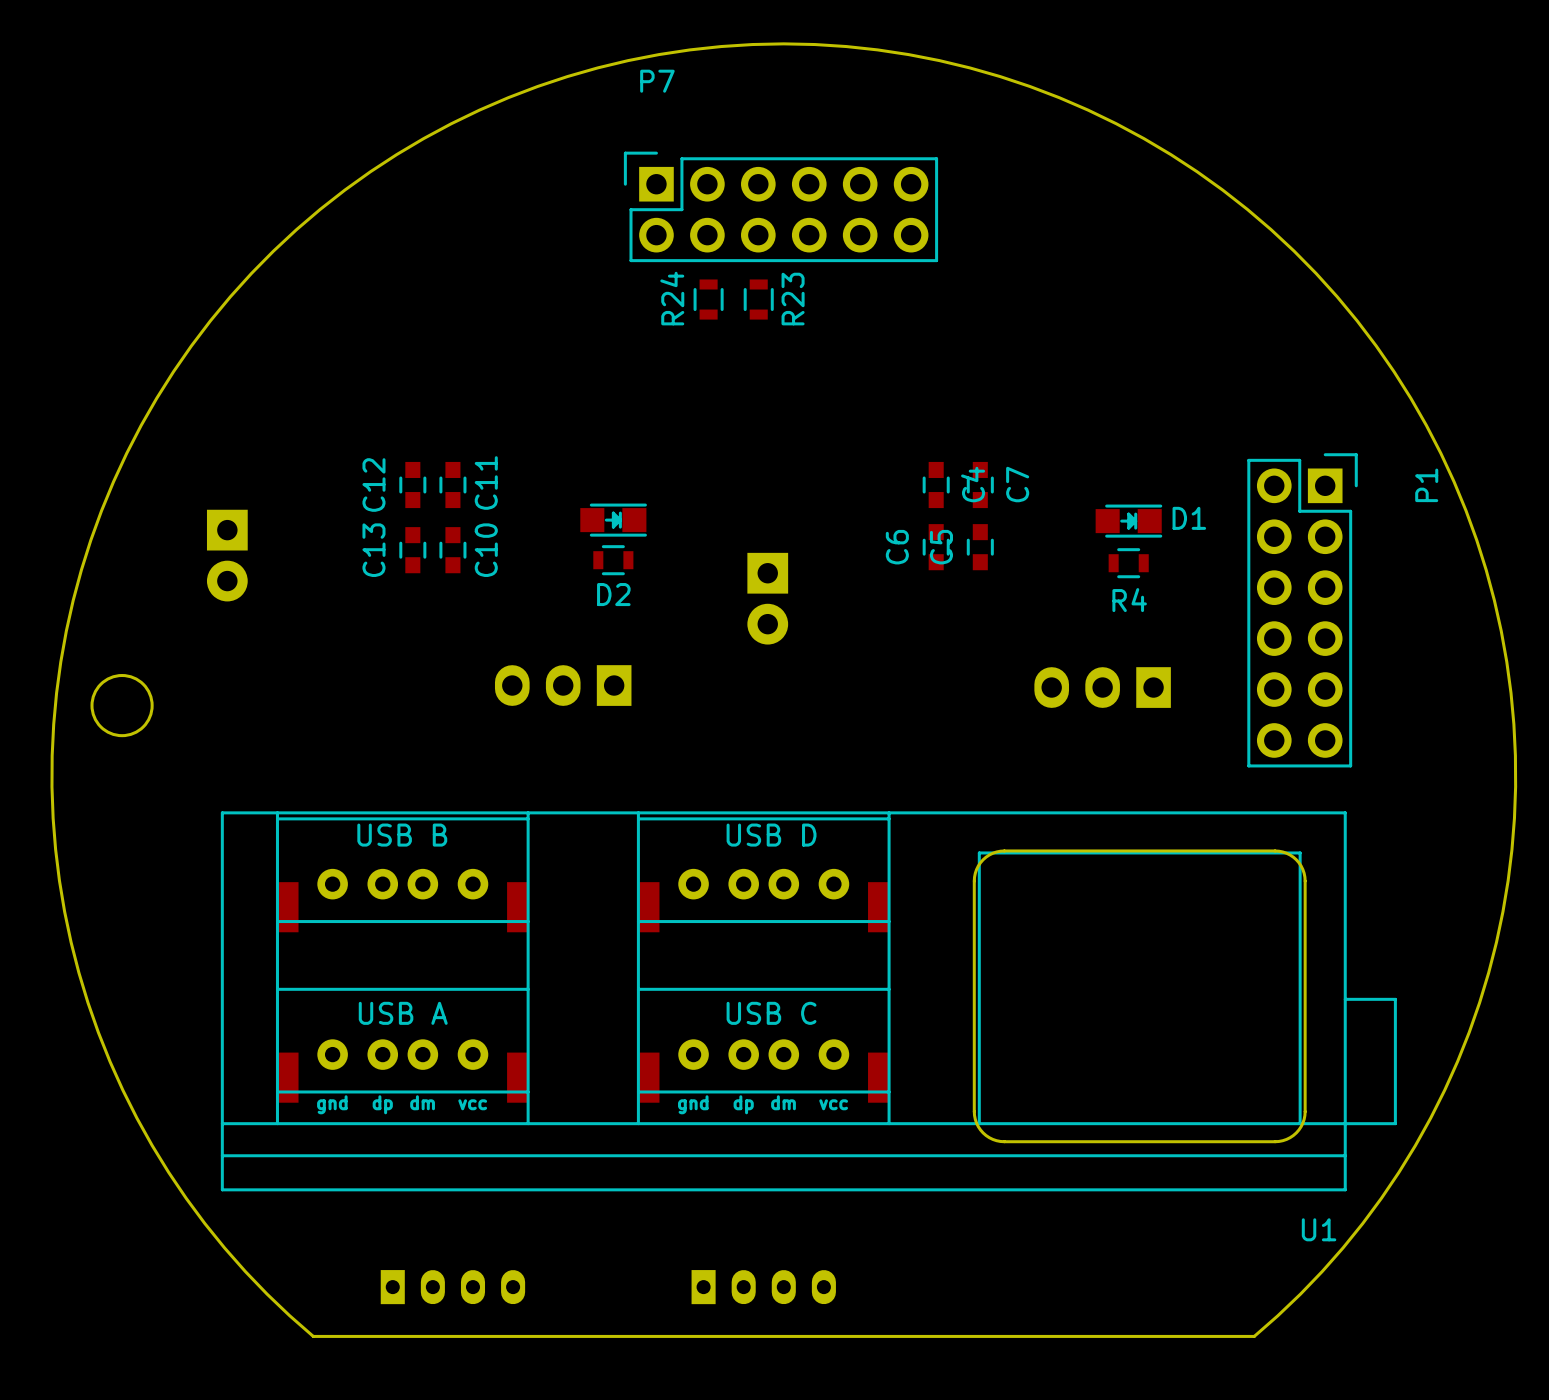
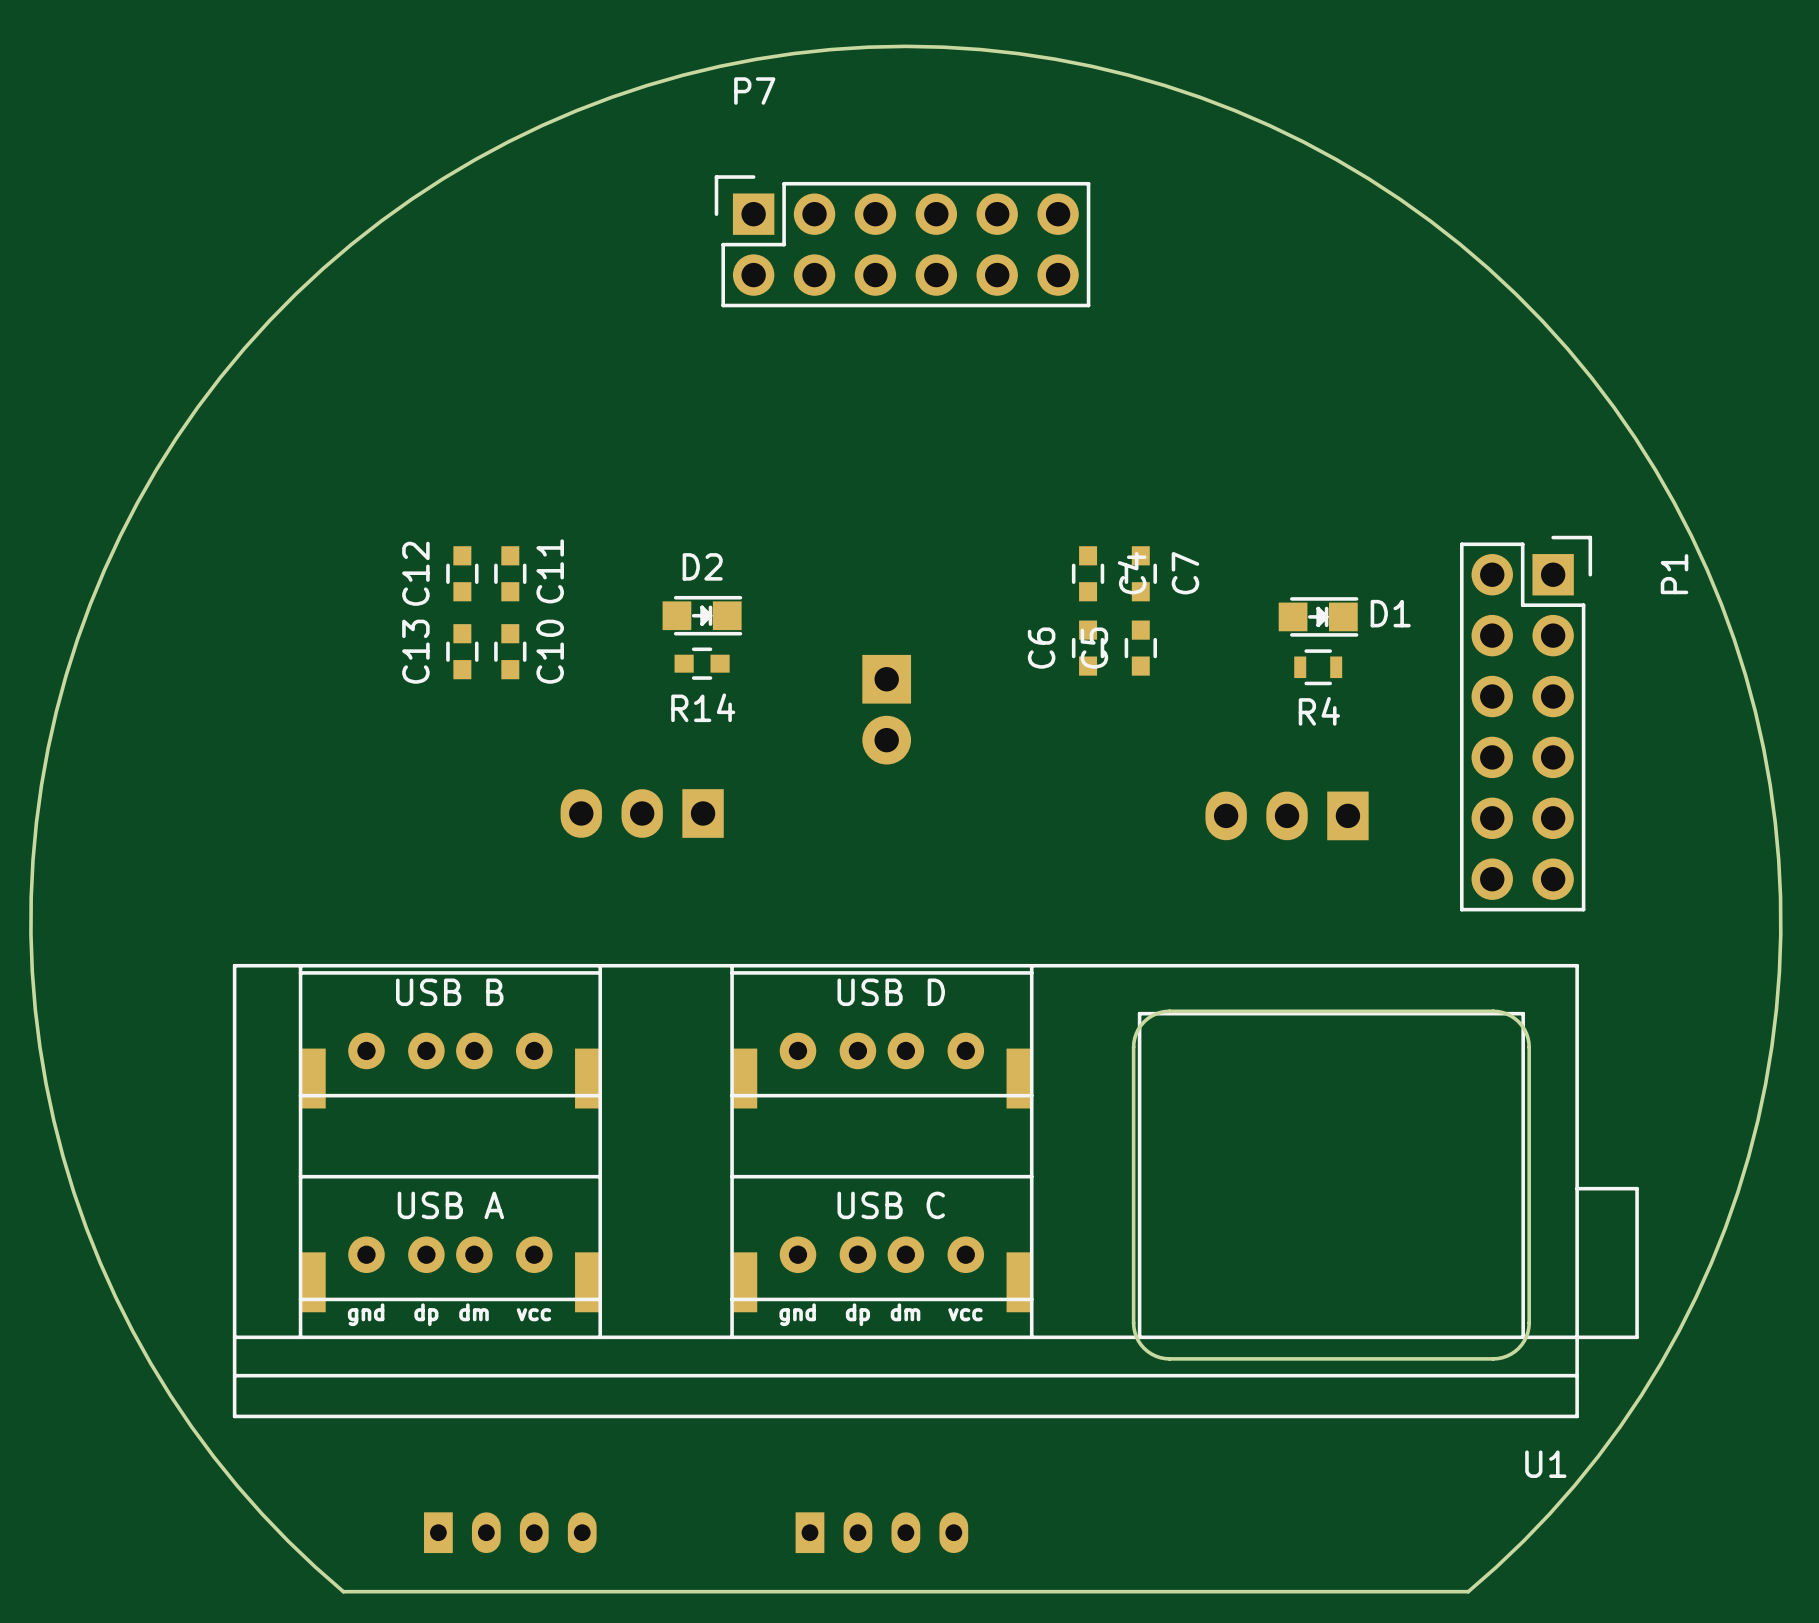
R24: (708, 299) -> none
R23: (758, 299) -> none
part: (227, 555) -> none
part: (613, 560) -> none
R14: none -> (702, 663)
D2 name position: D2 (613, 594) -> D2 (702, 566)
round board edge: [90, 674, 154, 738] -> none

